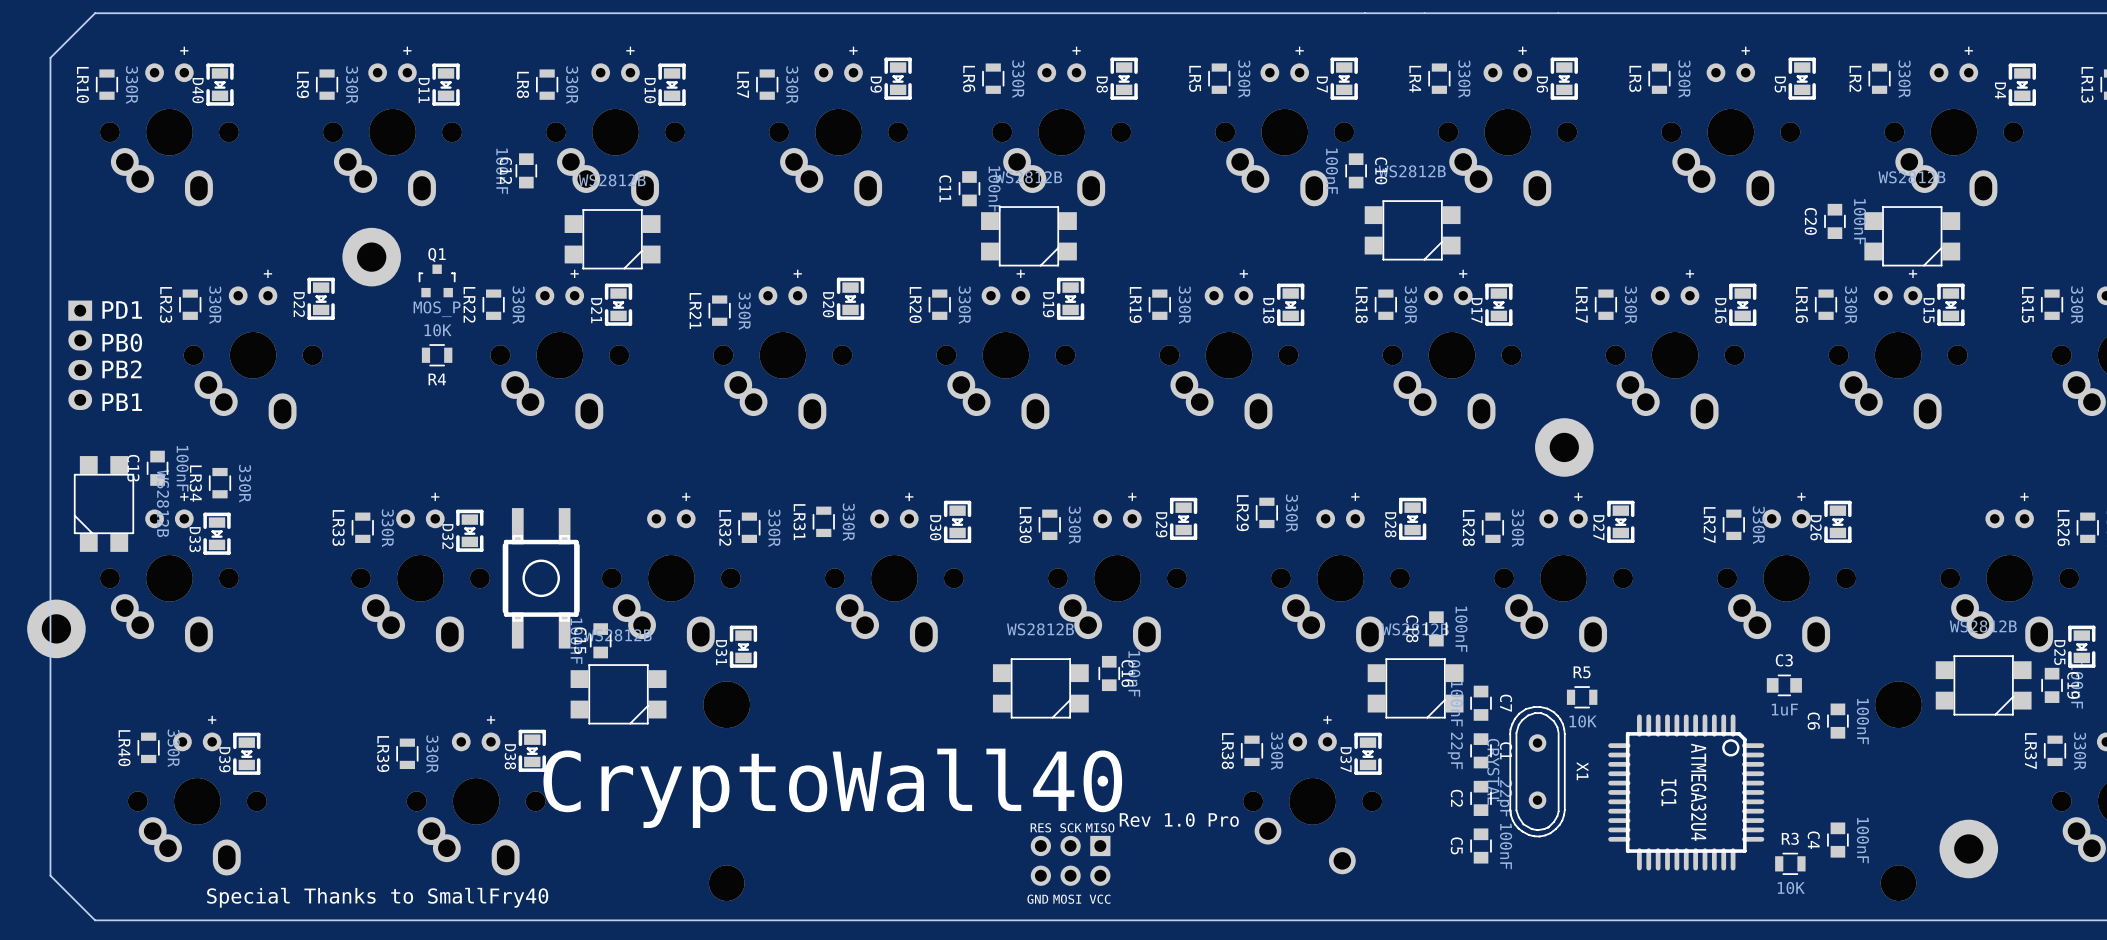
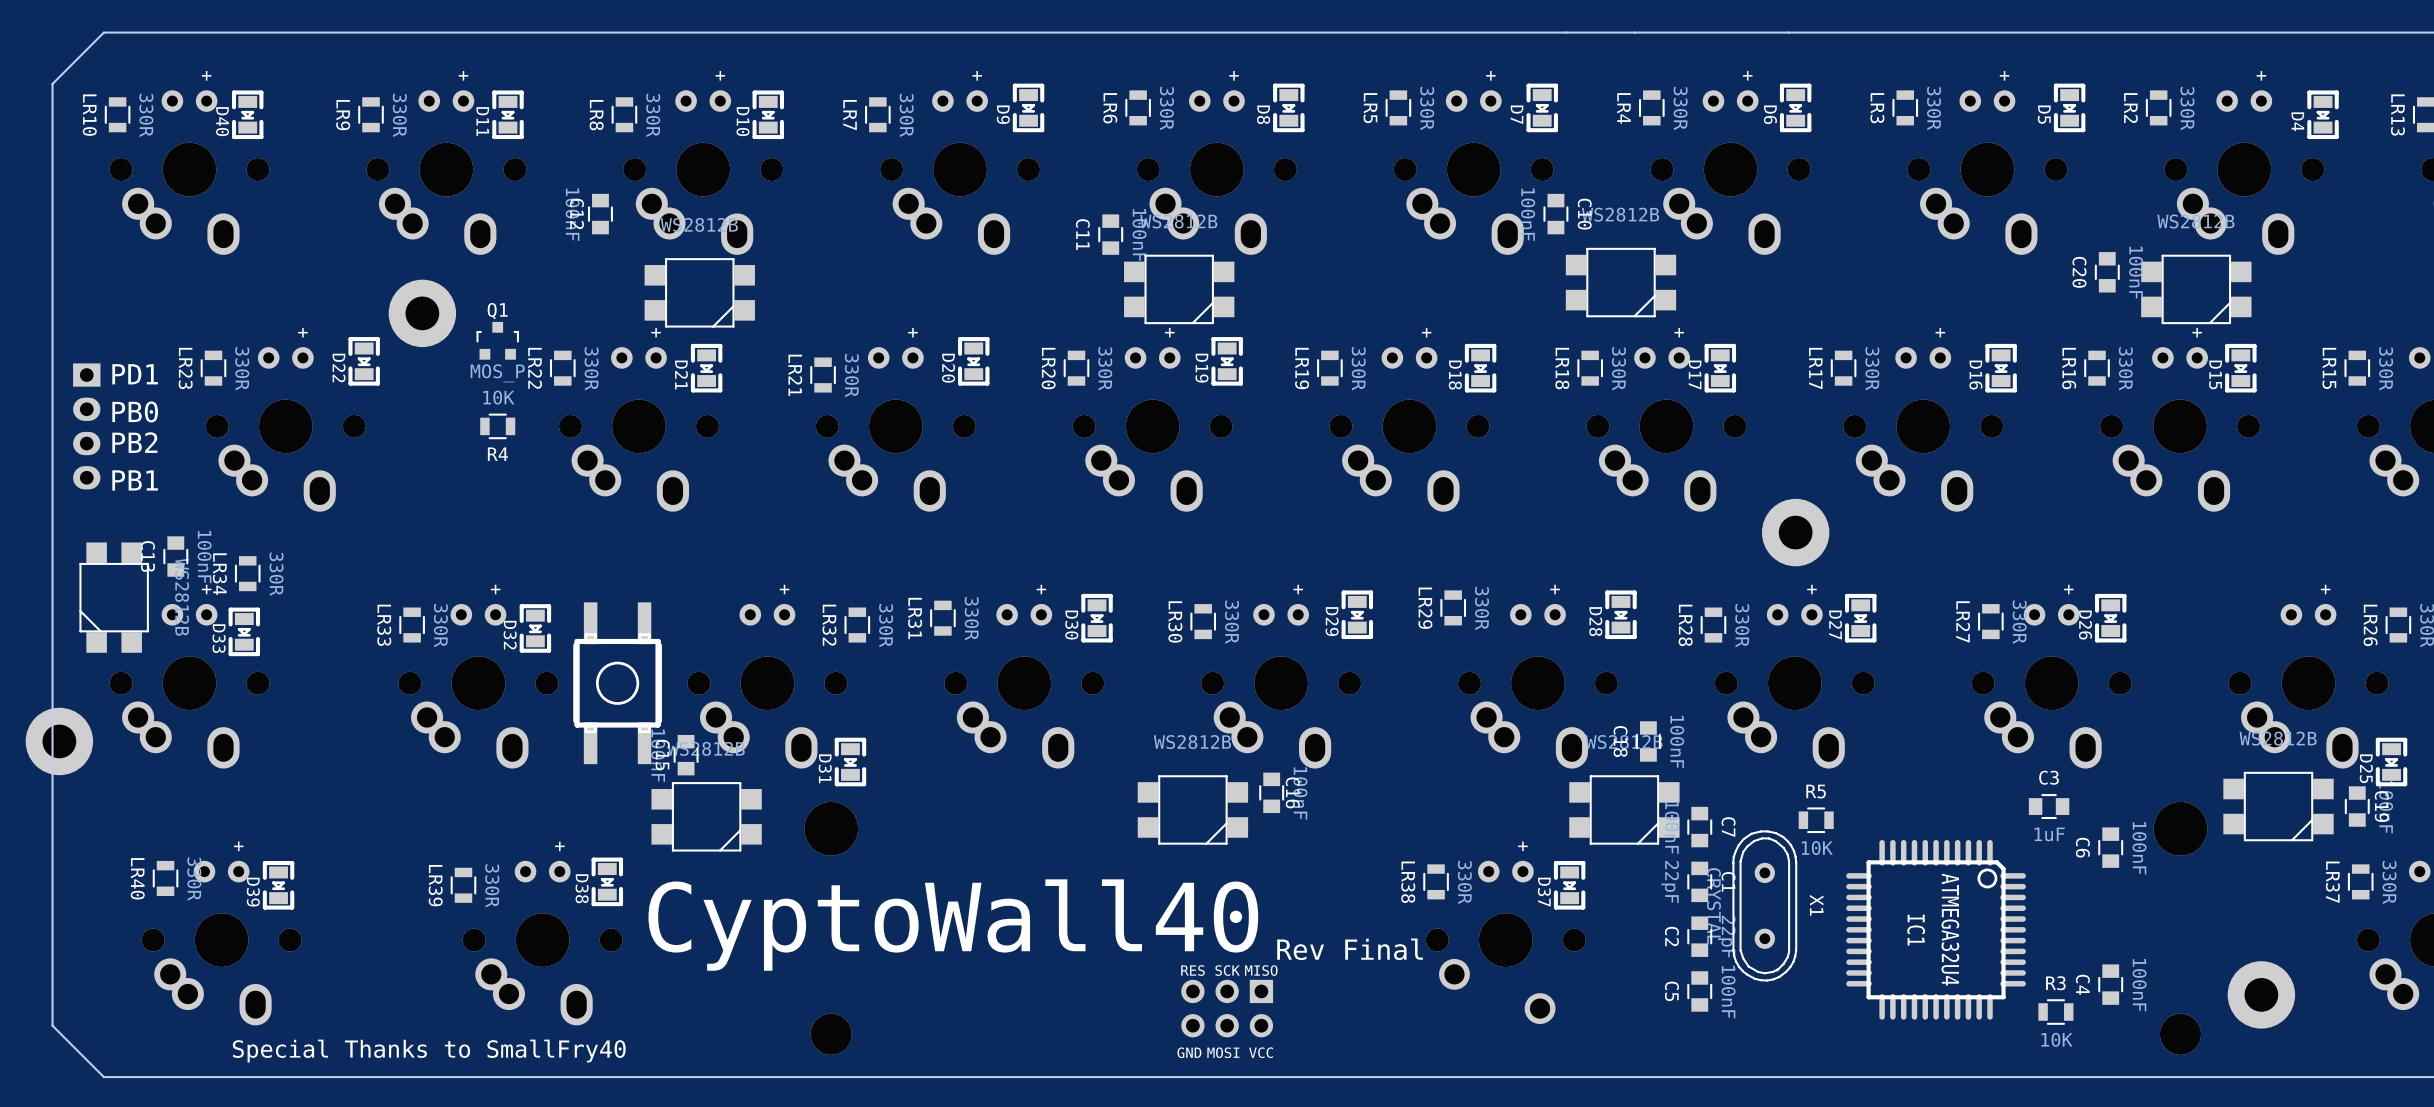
text: CryptoWall40 (832, 788) -> CyptoWall40 (953, 925)
text: Rev 1.0 Pro (1179, 819) -> Rev Final (1350, 949)

